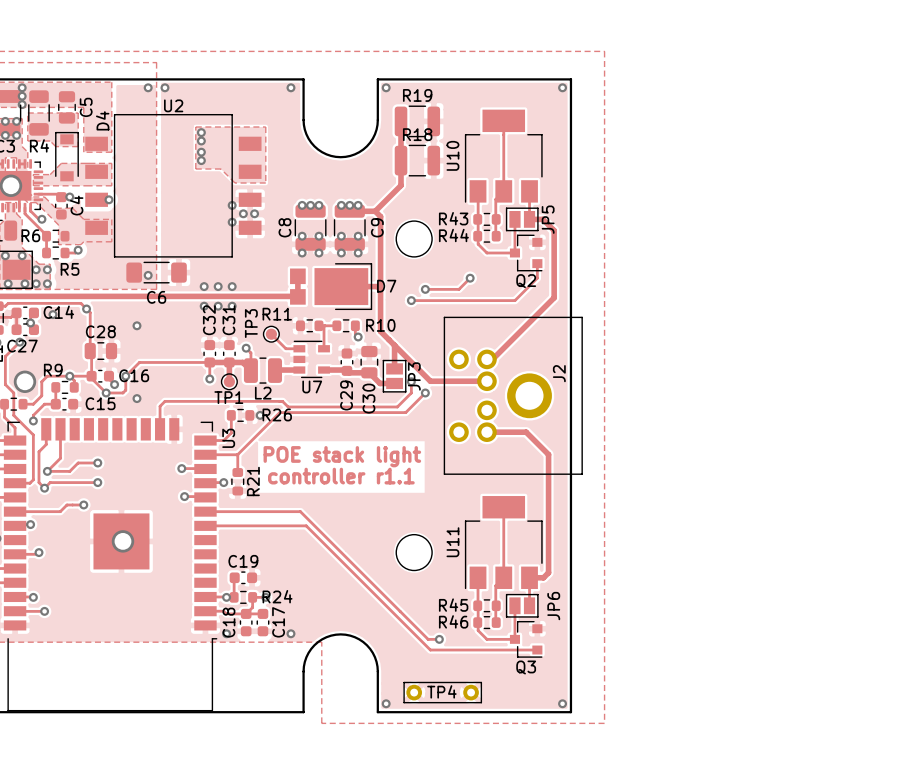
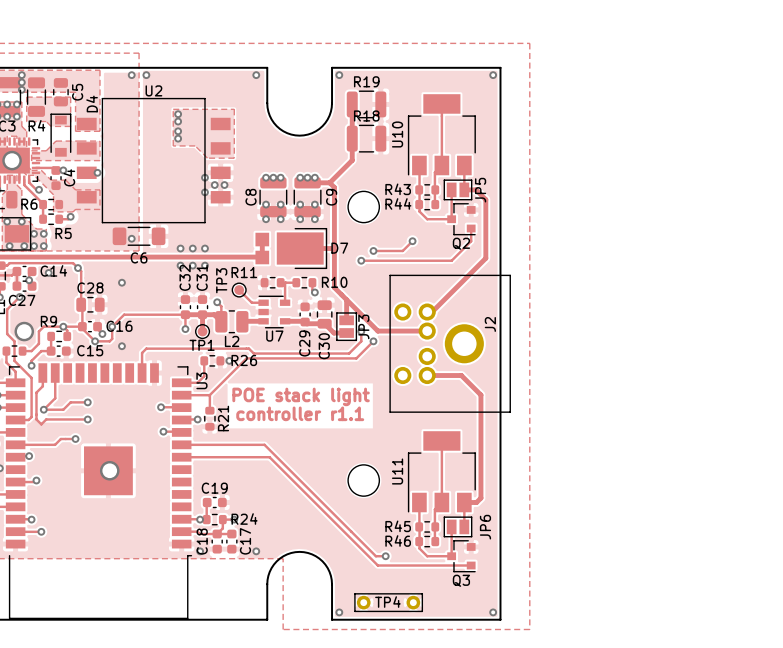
via: (44, 488) -> none

